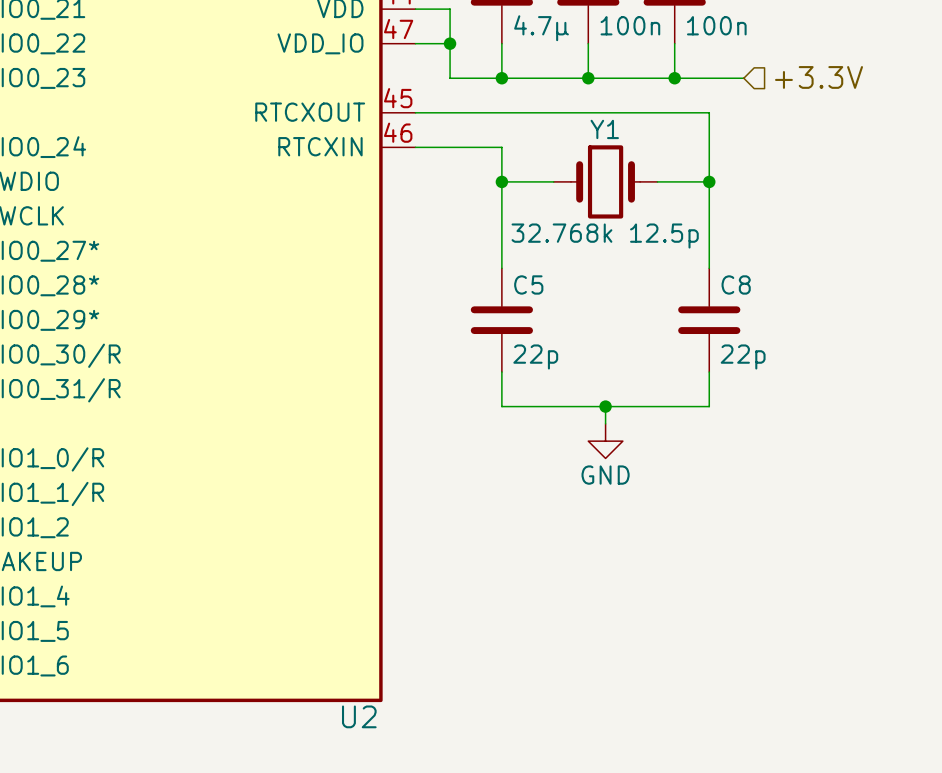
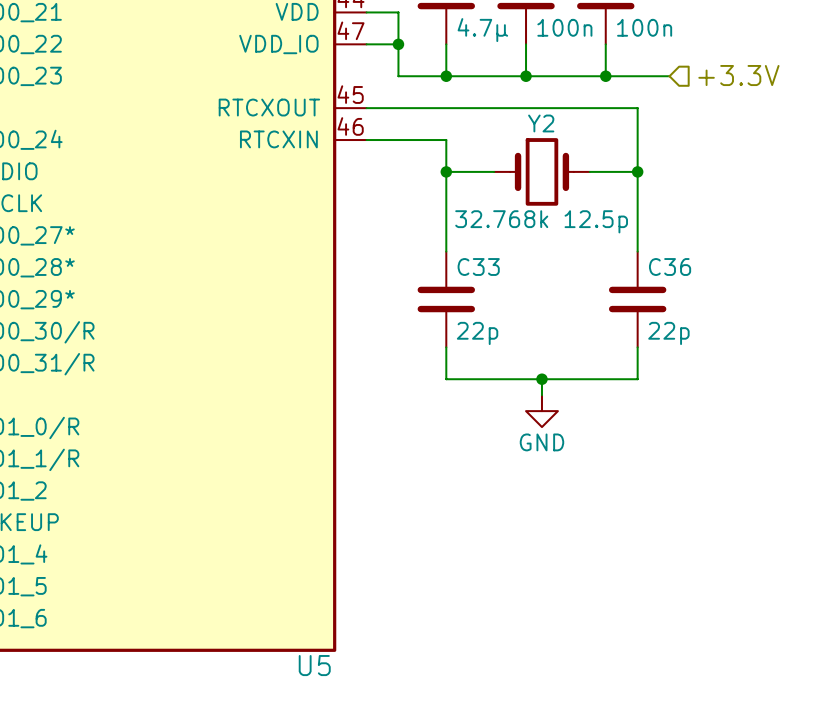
Y1 name: Y1 (604, 129) -> Y2 (541, 123)
C5 name: C5 (528, 284) -> C33 (478, 267)
C8 name: C8 (736, 284) -> C36 (670, 267)
U2 name: U2 (359, 716) -> U5 (314, 665)

